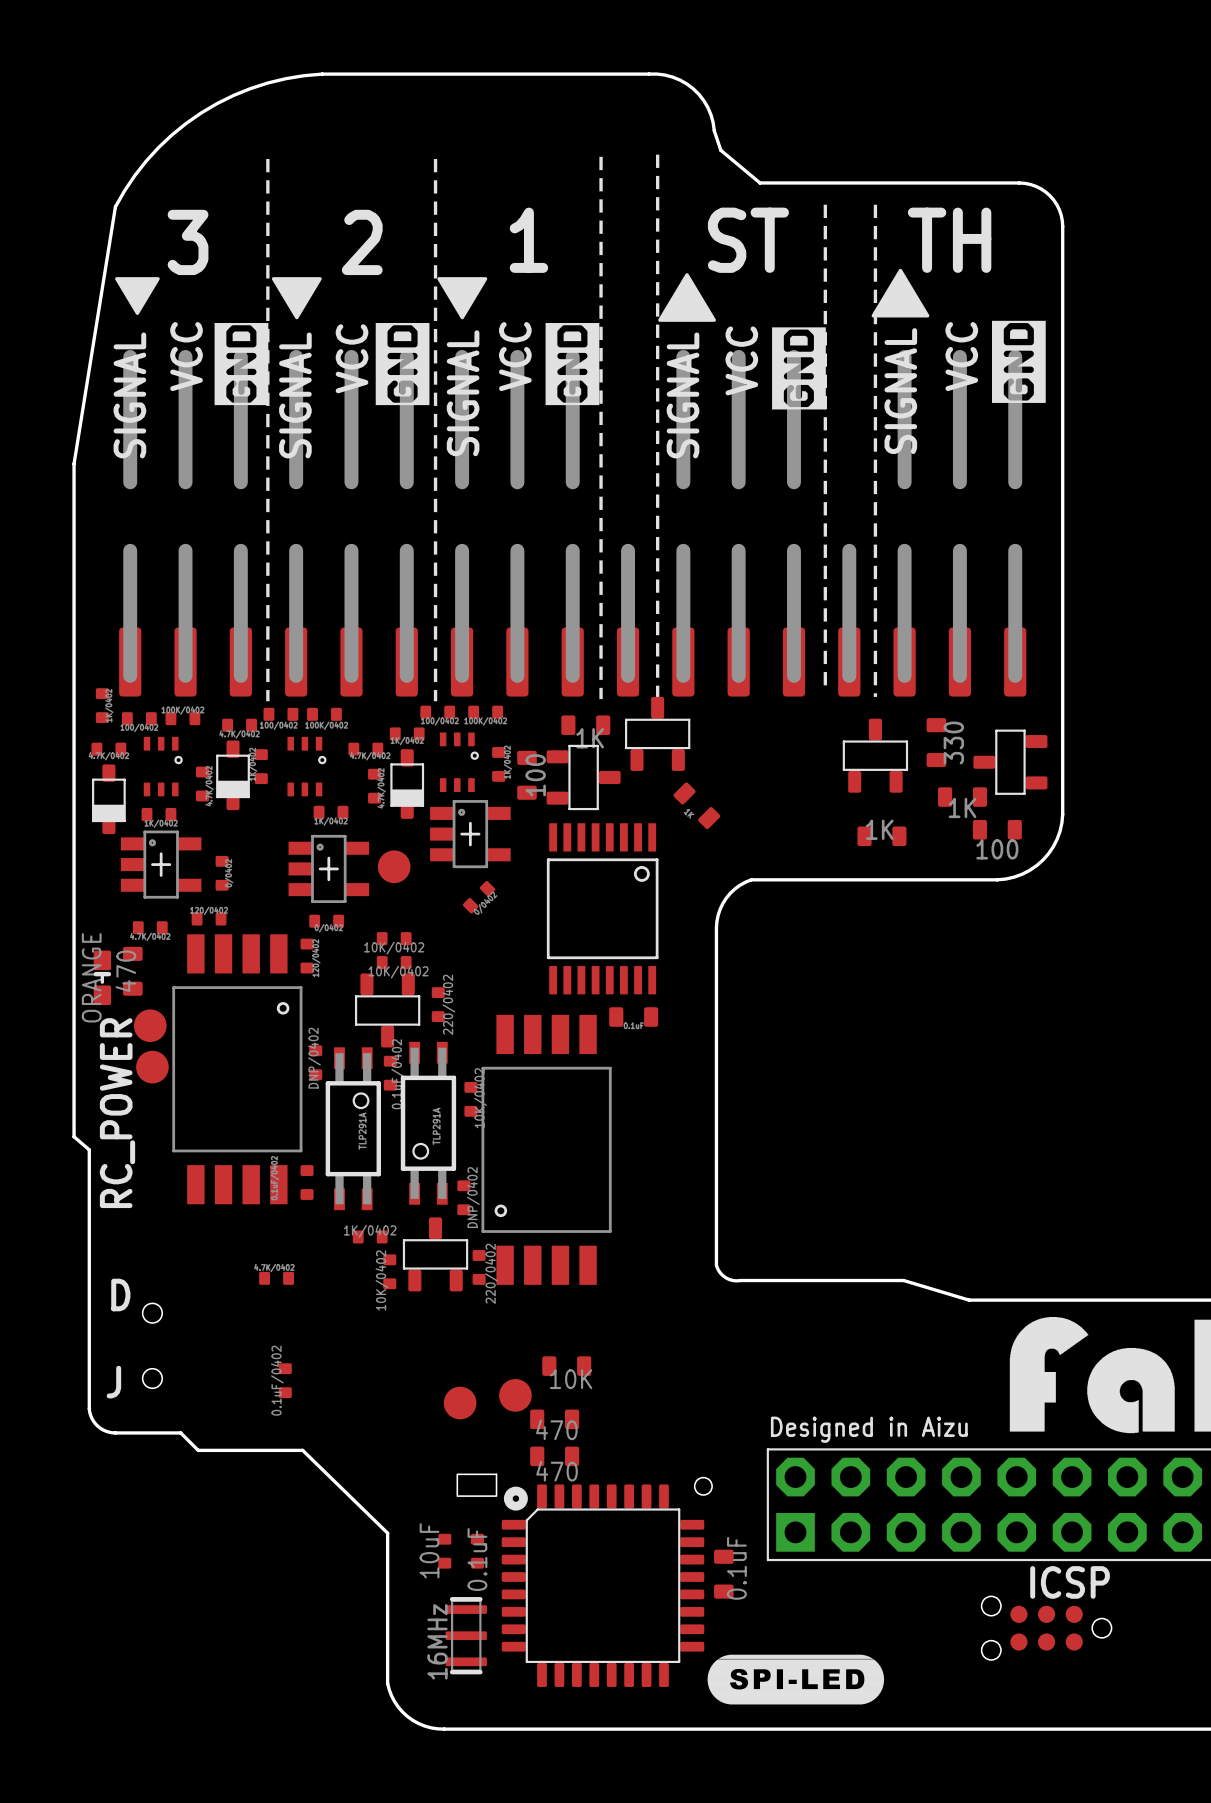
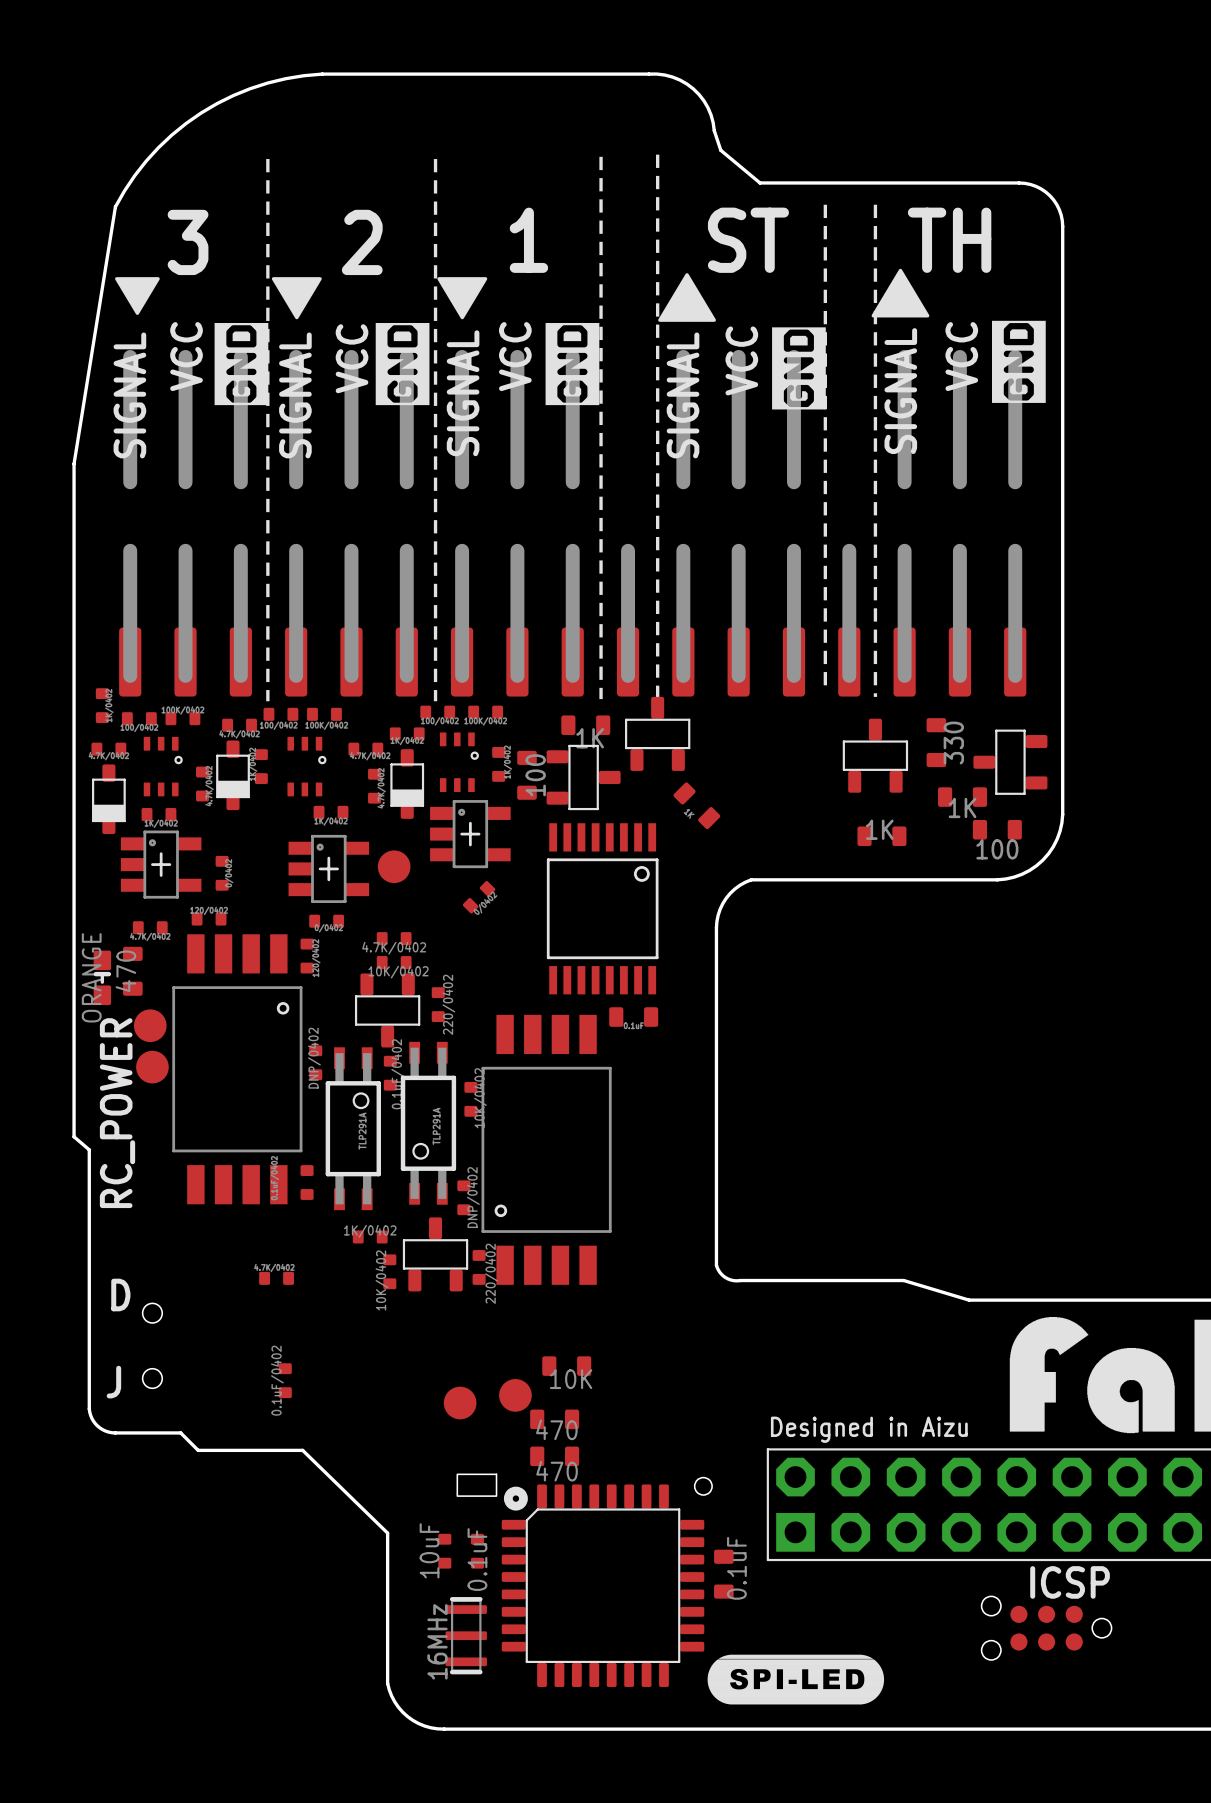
part value: 10K/0402 (394, 948) -> 4.7K/0402 (394, 948)

